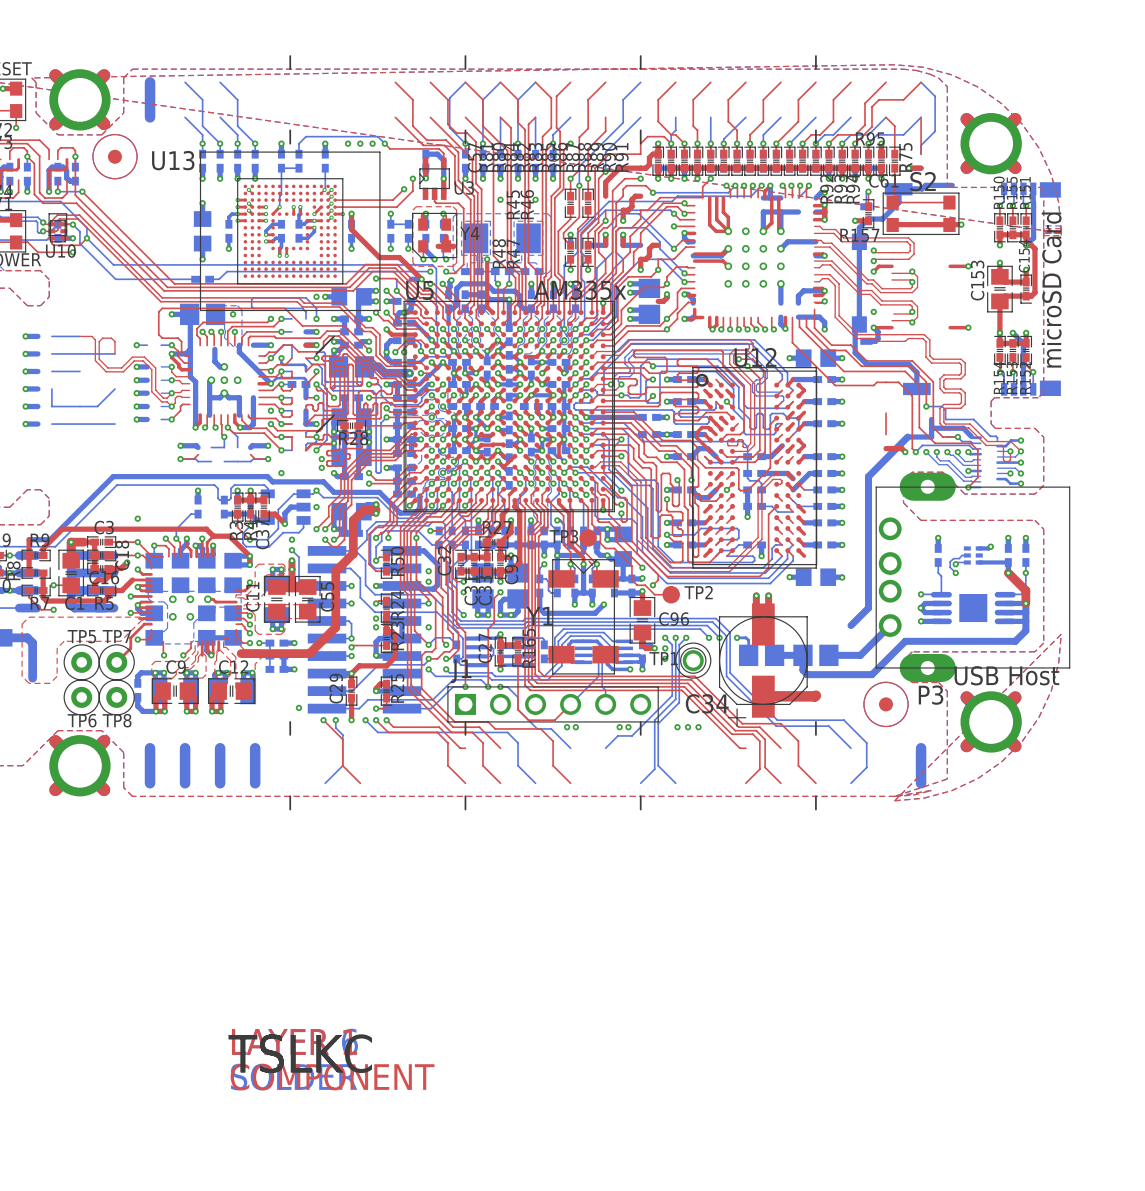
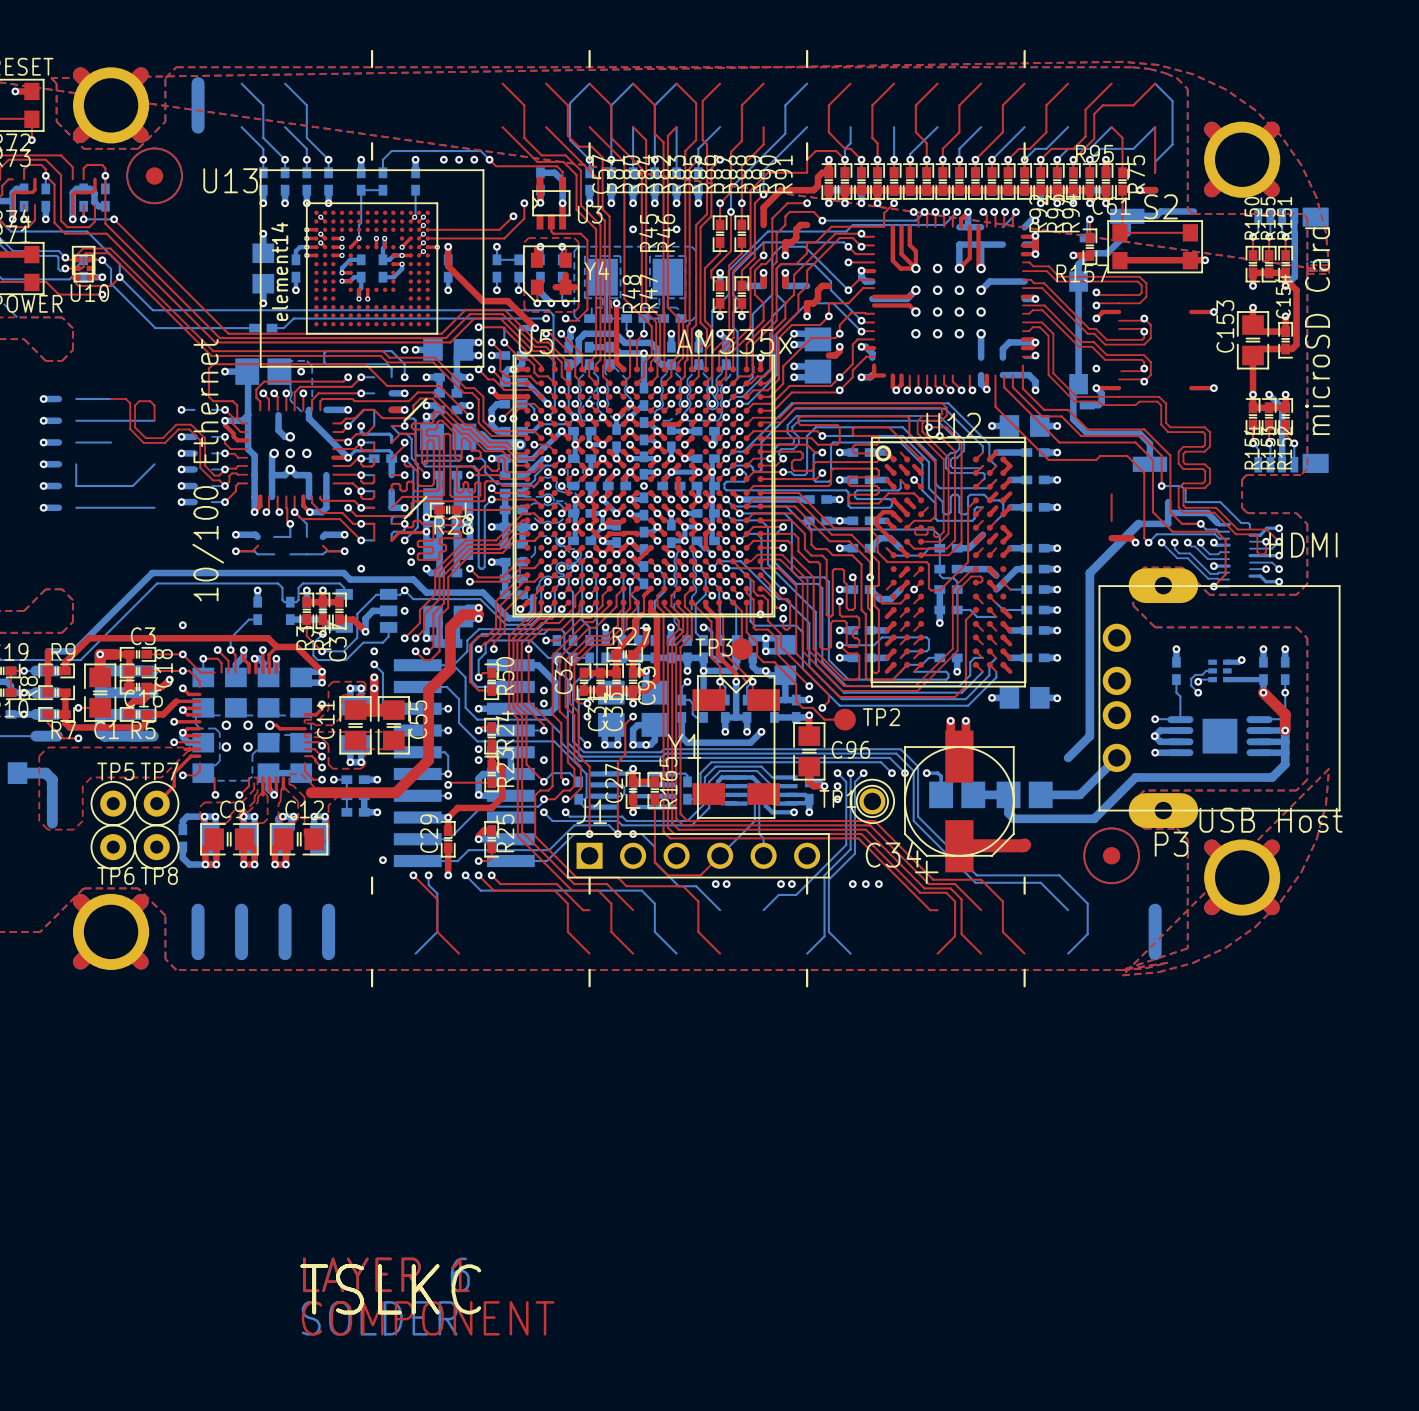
text: none -> element14 (279, 271)
text: none -> 10/100 Ethernet (208, 470)
text: none -> HDMI (1303, 545)

